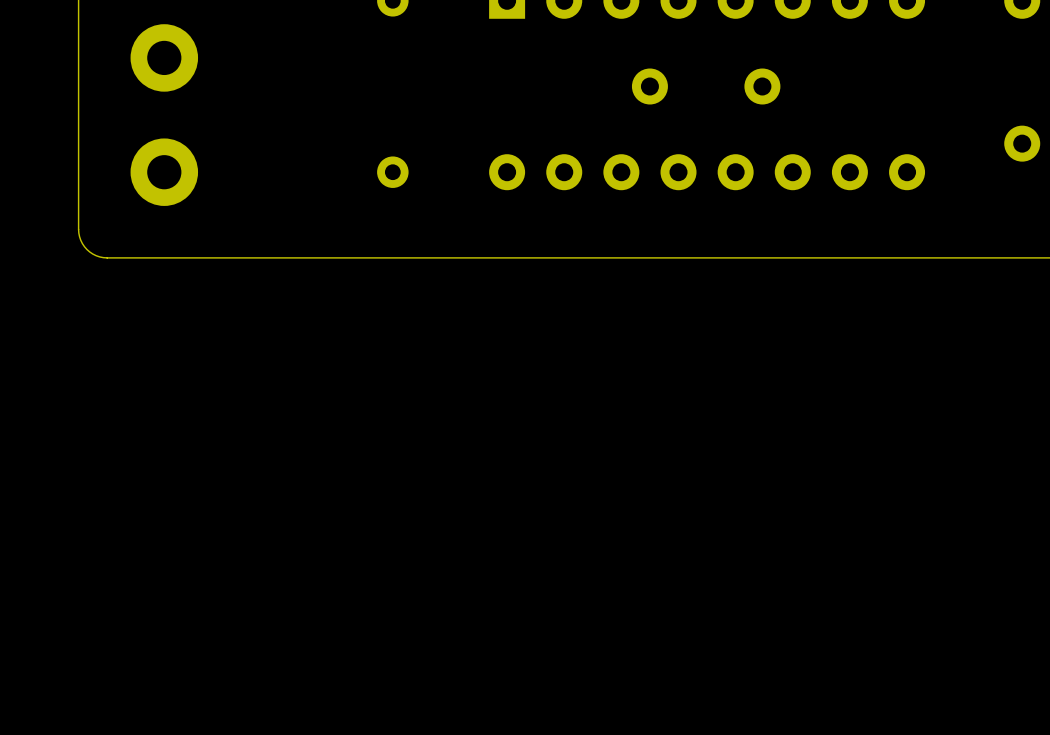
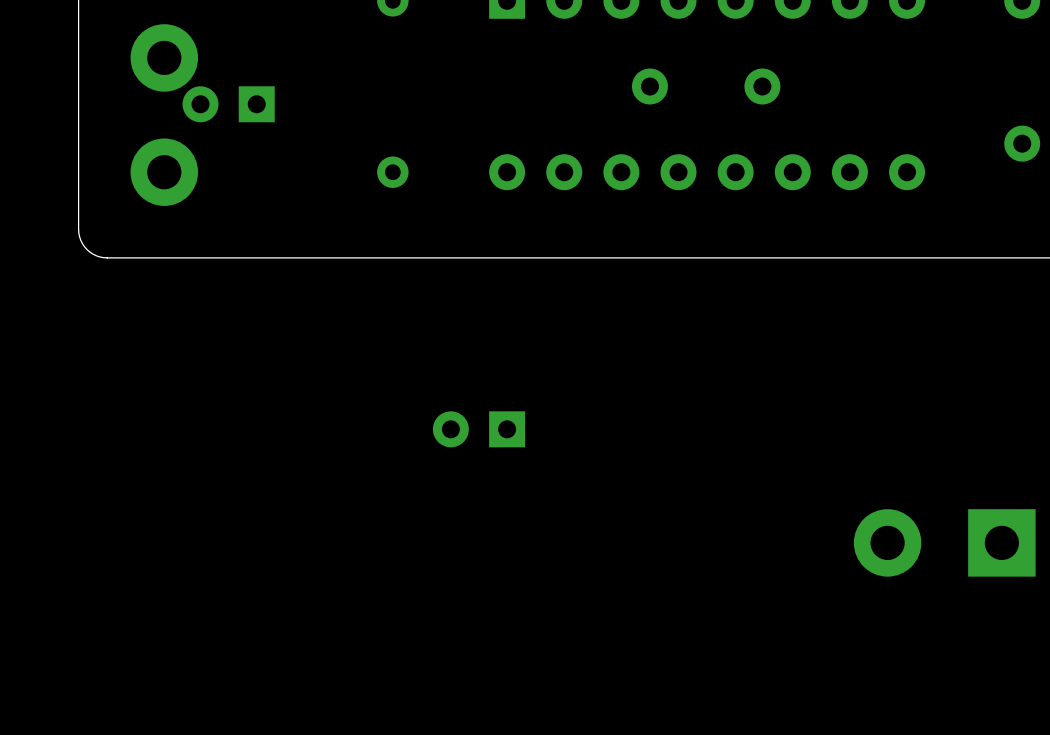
part: none -> (228, 104)
part: none -> (478, 429)
part: none -> (944, 542)

